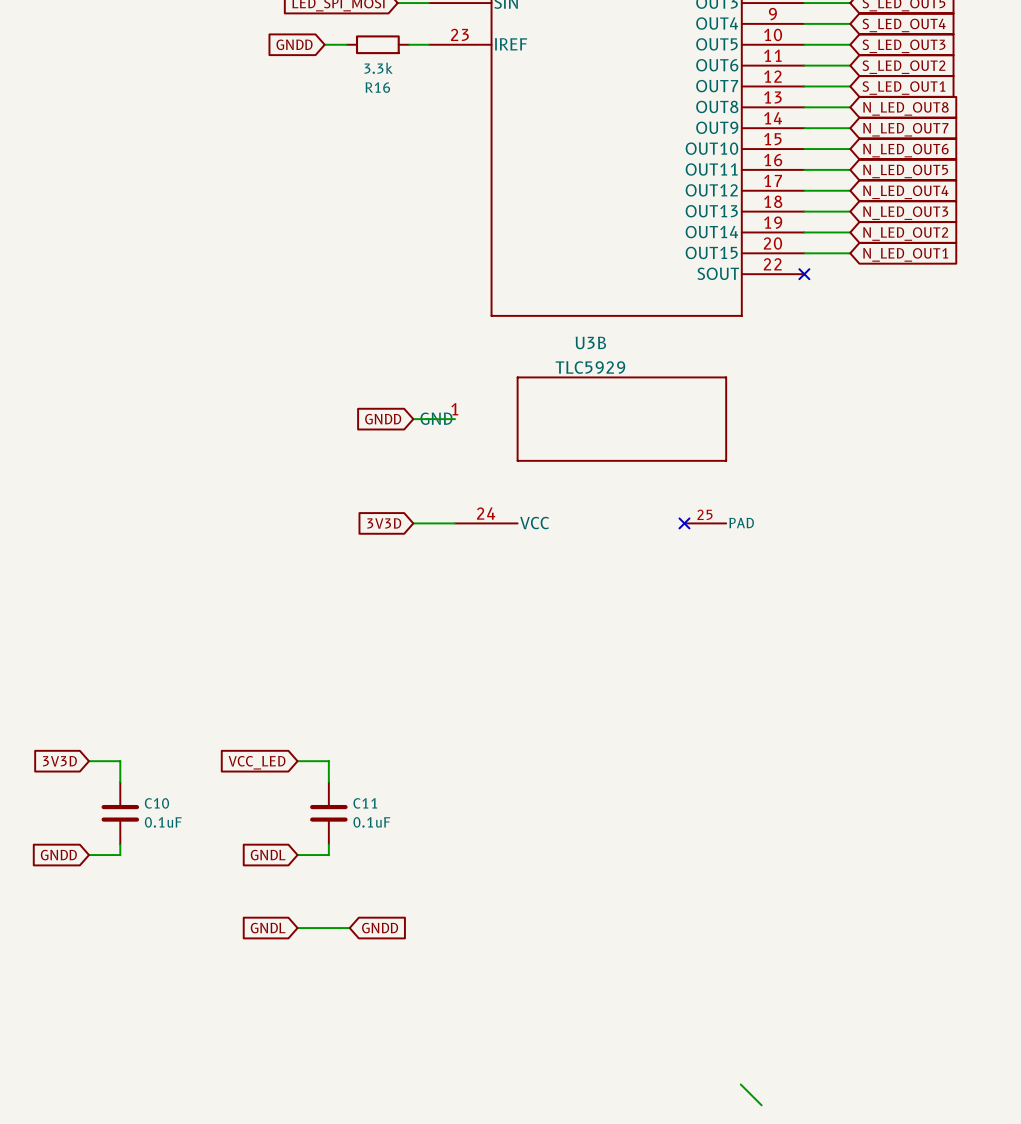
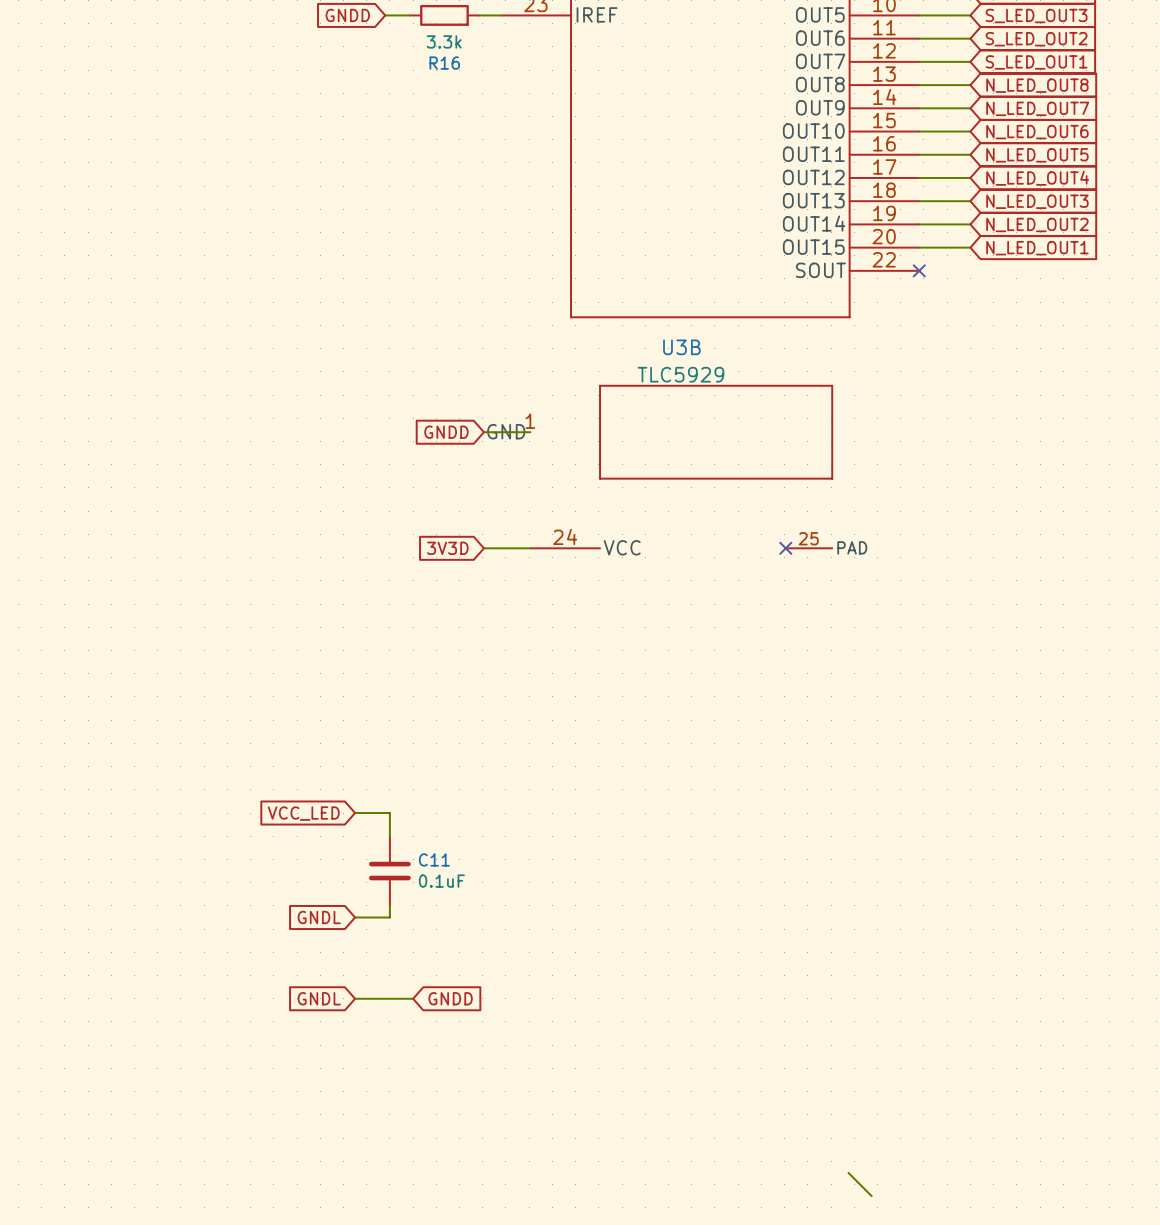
global label: 3V3D (59, 761) -> none
wire: (89, 761) (120, 761) (120, 782) -> none
C10: 0.1uF (120, 813) -> none
wire: (120, 844) (120, 855) (89, 855) -> none
global label: GNDD (58, 855) -> none

